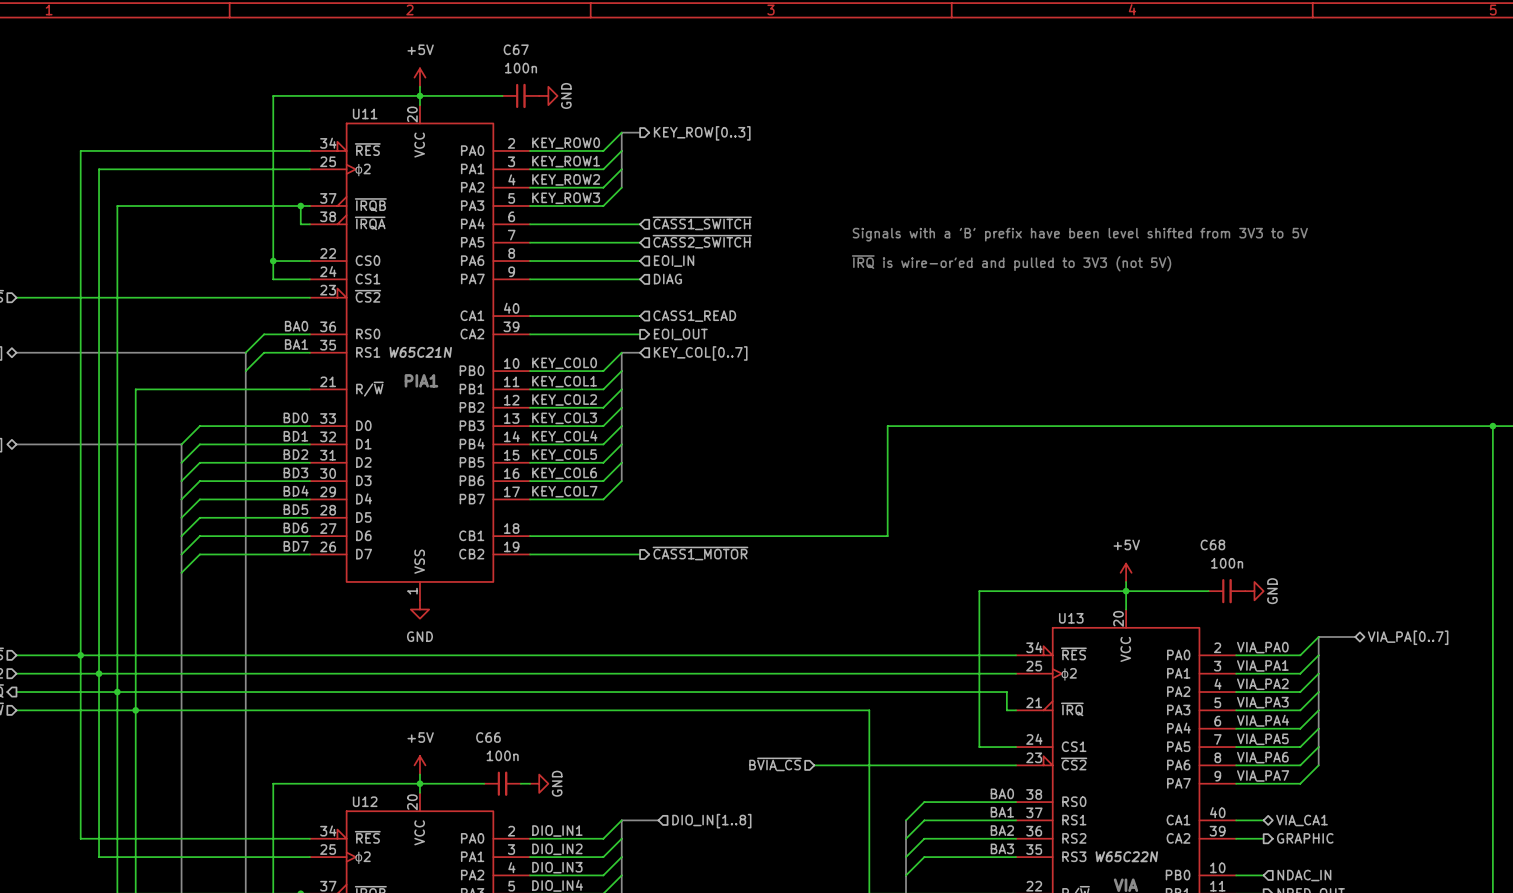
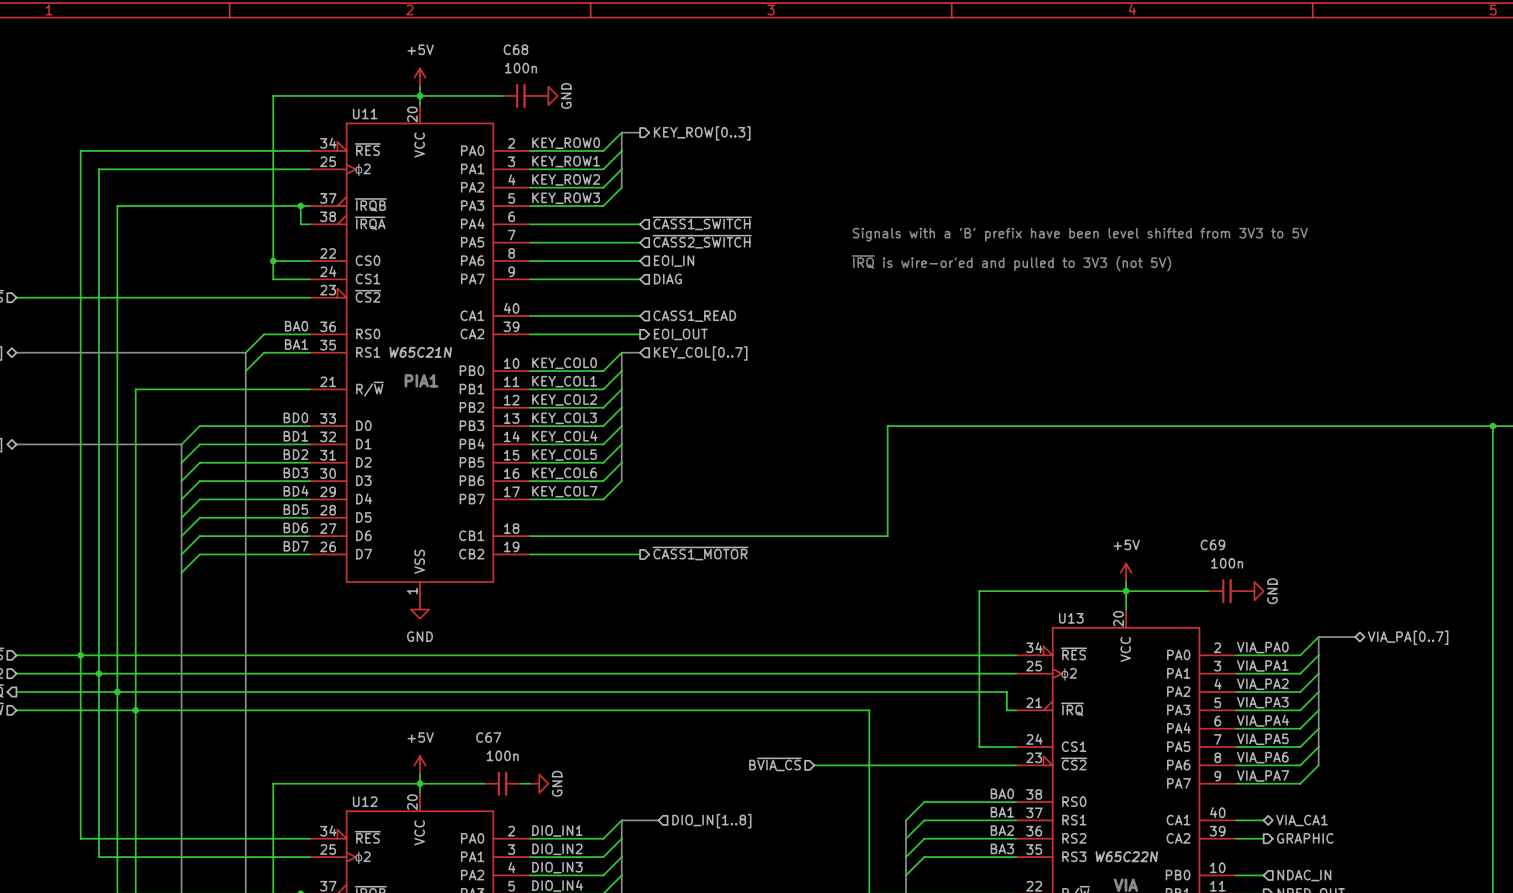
C67 name: C67 (516, 49) -> C68 (515, 49)
C68 name: C68 (1212, 544) -> C69 (1212, 544)
C66 name: C66 (488, 737) -> C67 (488, 737)

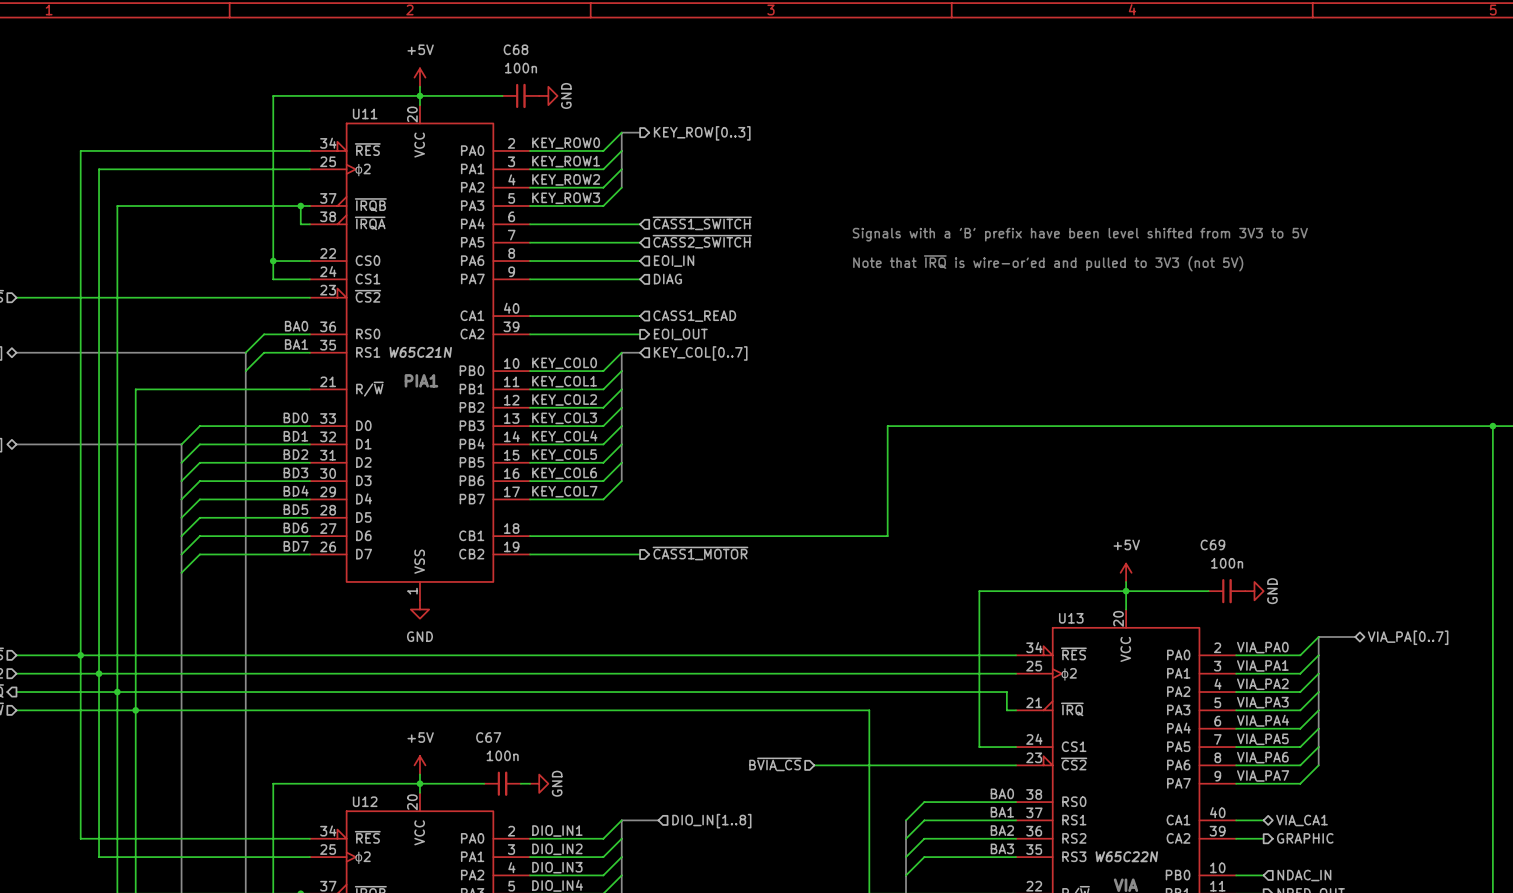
text: ~{IRQ} is wire-or'ed and pulled to 3V3 (not 5V) (1011, 263) -> Note that ~{IRQ} is wire-or'ed and pulled to 3V3 (not 5V) (1048, 263)

